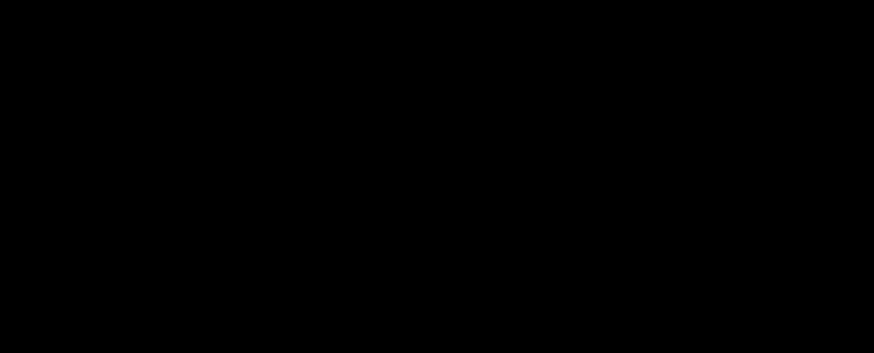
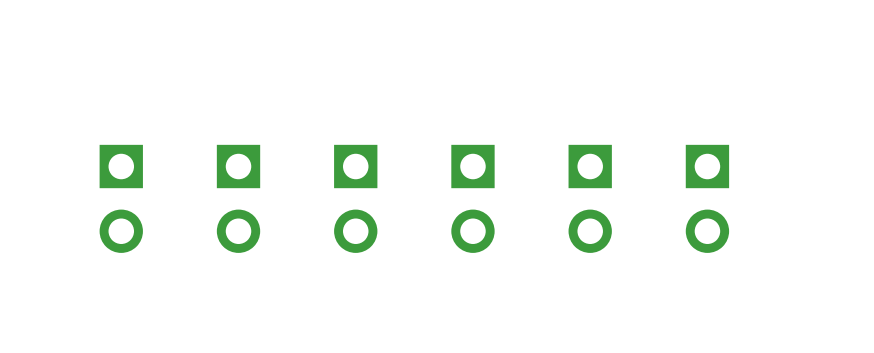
part: none -> (121, 198)
part: none -> (238, 198)
part: none -> (355, 198)
part: none -> (472, 198)
part: none -> (590, 198)
part: none -> (707, 198)

